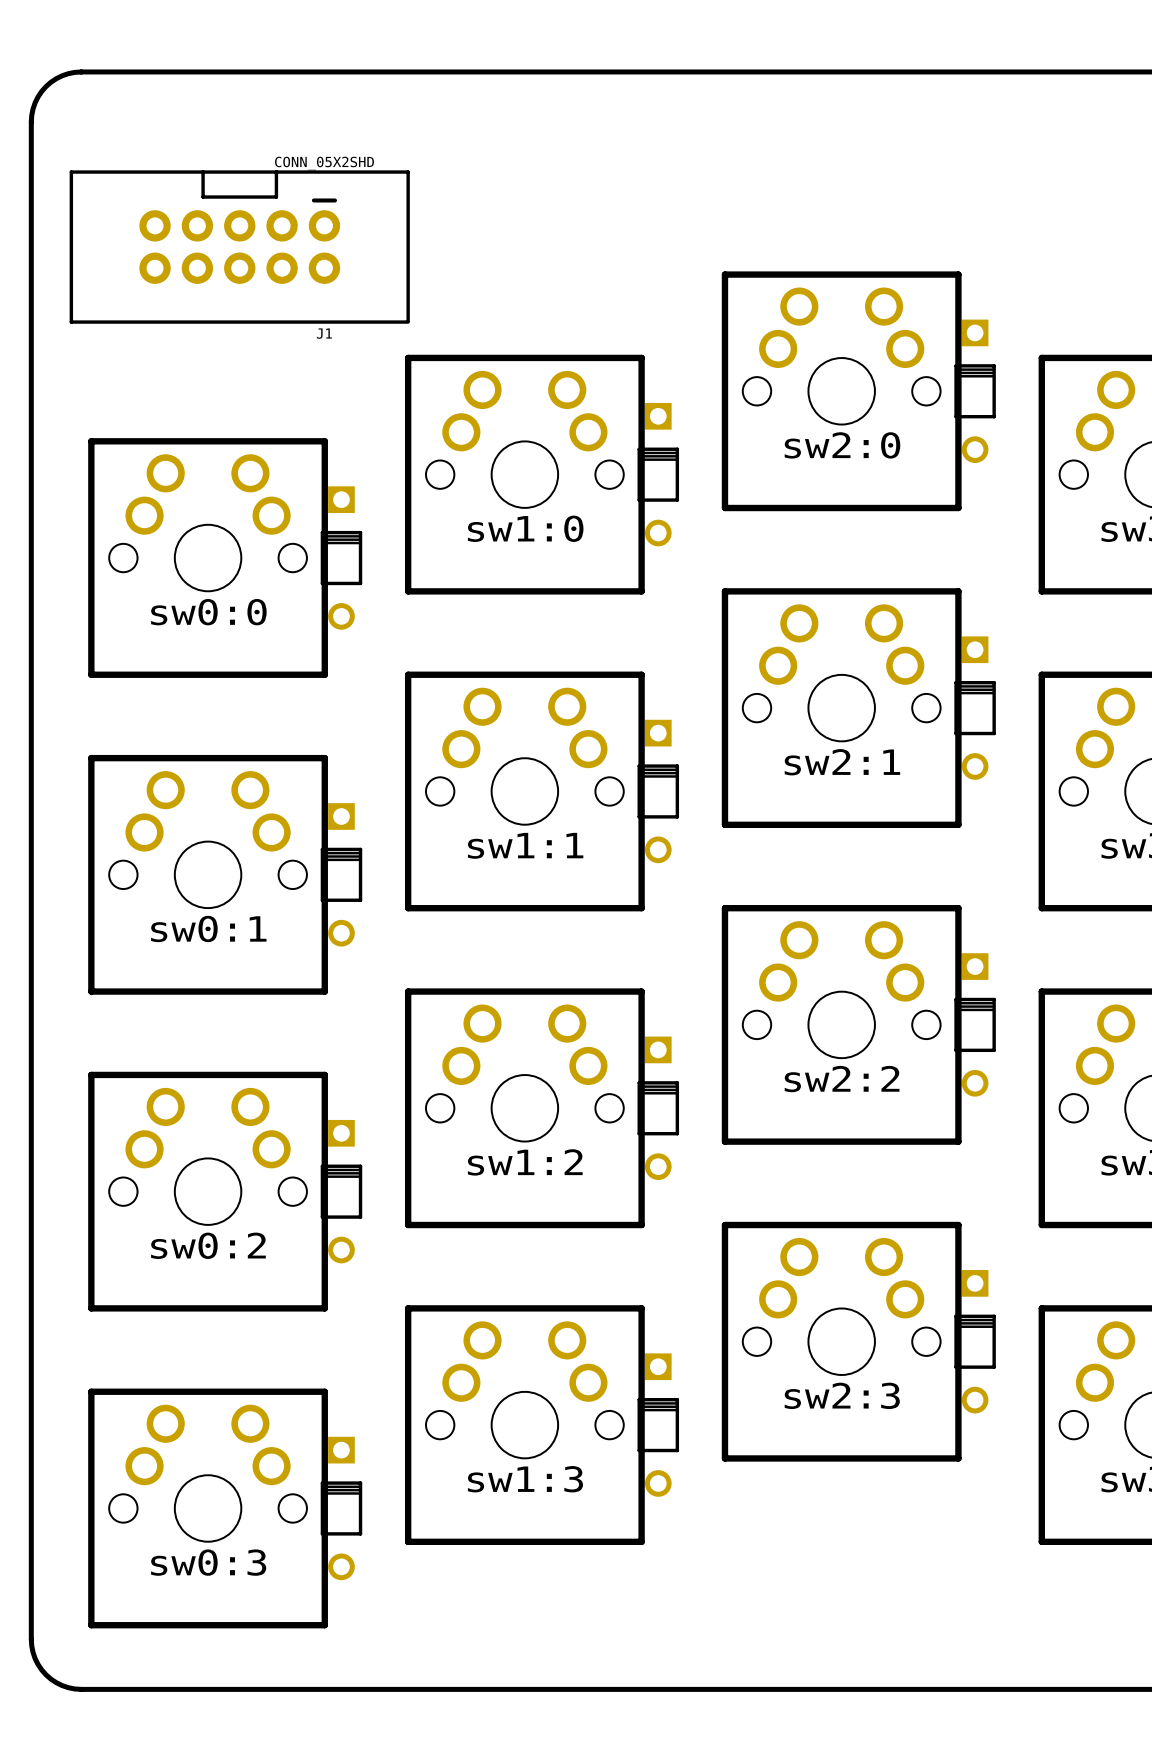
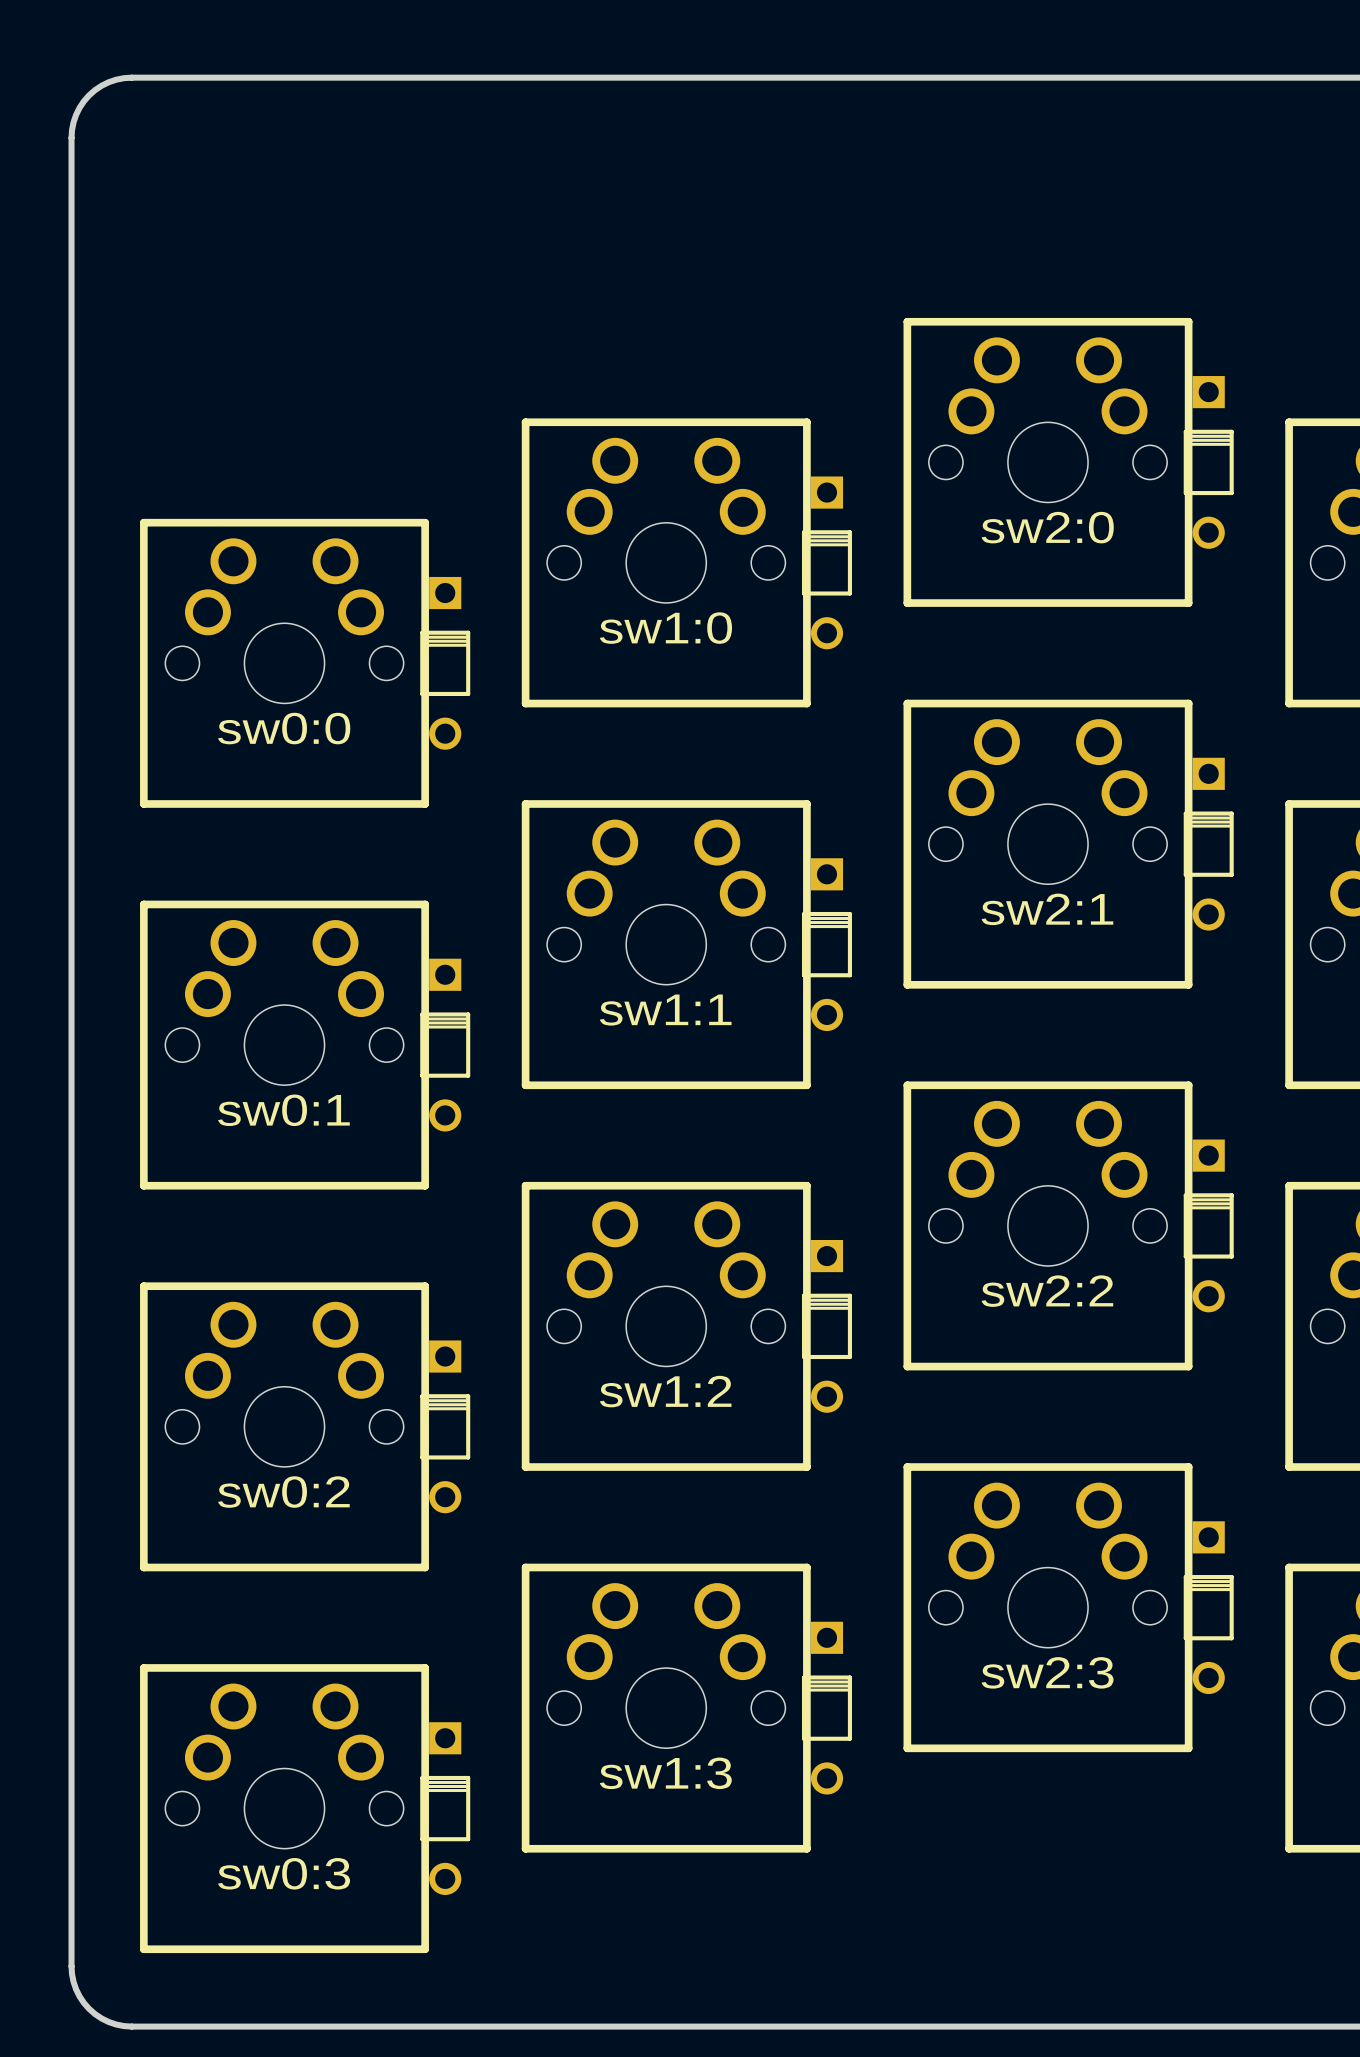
J1: CONN_05X2SHD (239, 247) -> none

